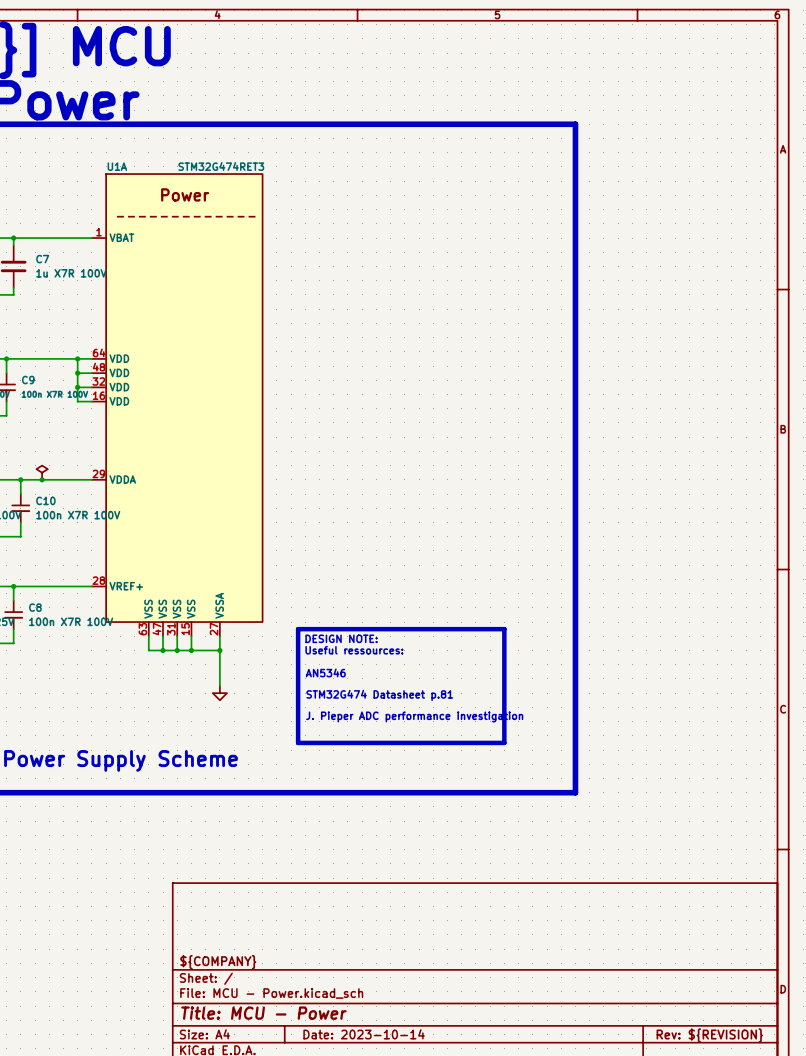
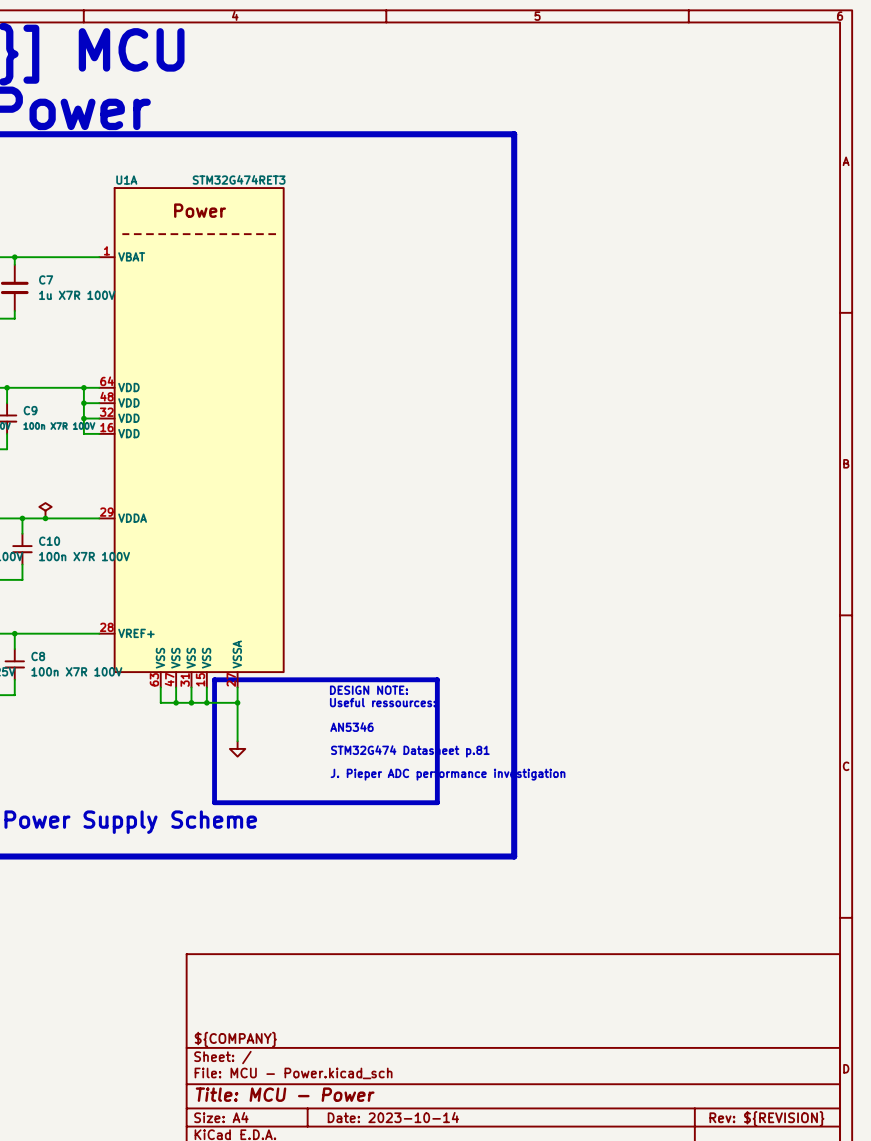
line: (475, 124) (575, 124) (575, 792) (475, 792) -> (514, 134) (514, 856)
line: (298, 629) (298, 742) -> (322, 679) (214, 679) (214, 802) (322, 802)
line: (404, 629) (504, 629) (504, 742) (404, 742) -> (437, 679) (437, 802)

